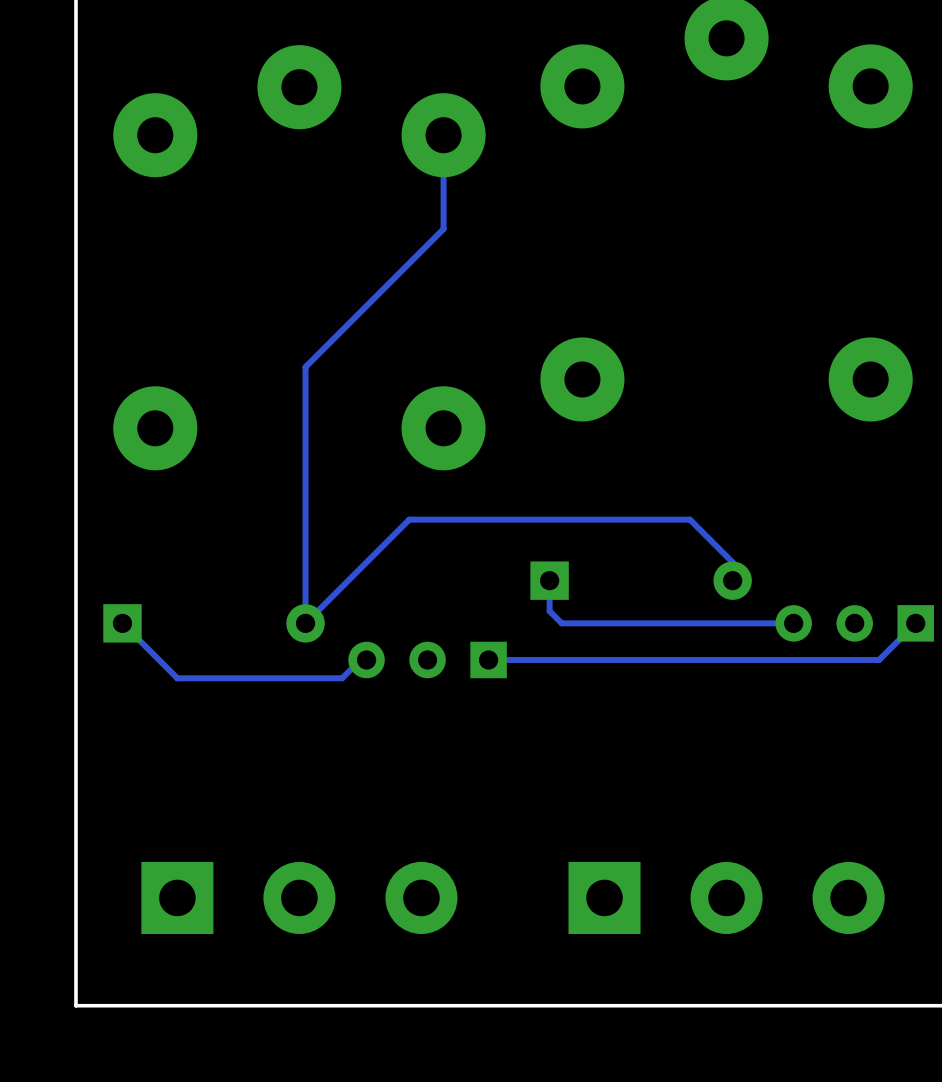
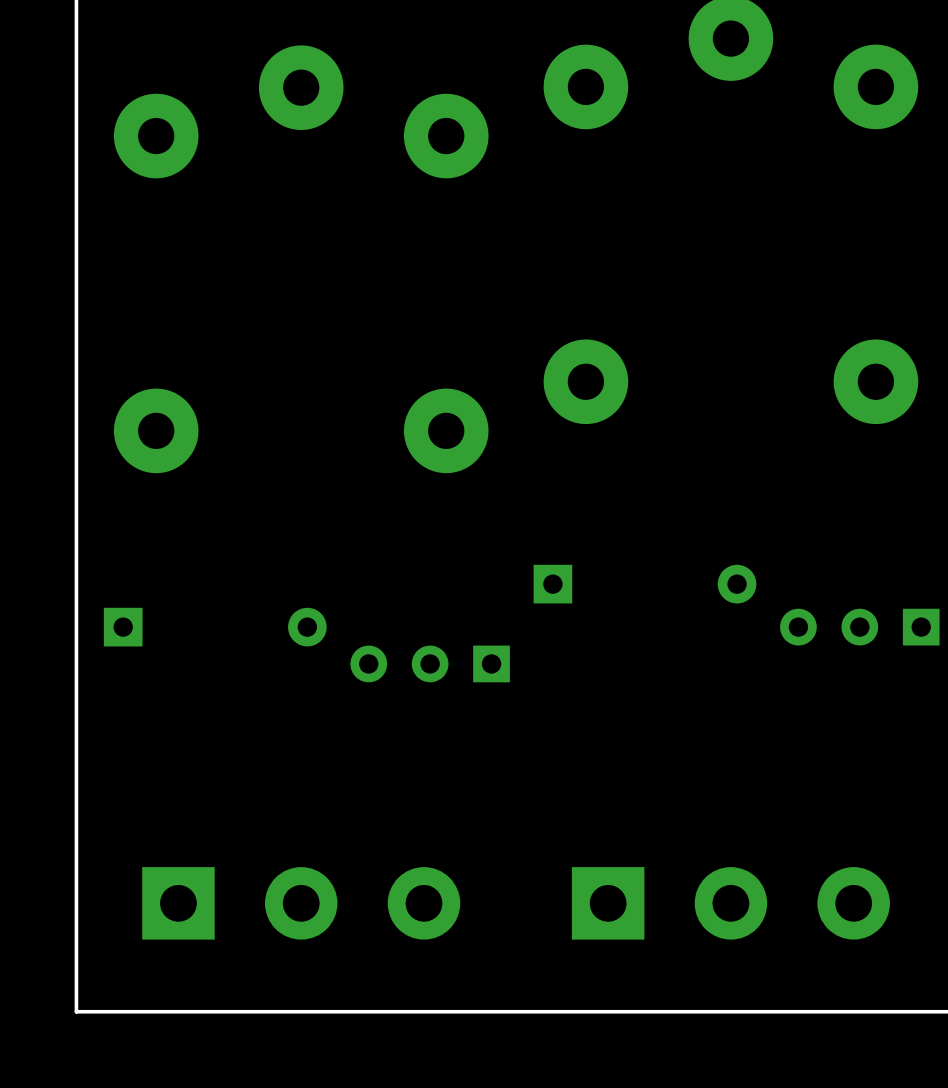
track: (443, 135) (443, 229) (305, 367) (305, 623) (409, 519) (689, 519) (732, 562) (732, 580) -> none
track: (549, 580) (549, 611) (561, 623) (793, 623) -> none
track: (122, 623) (177, 678) (342, 678) (360, 659) (366, 659) -> none
track: (915, 623) (879, 659) (488, 659) -> none

